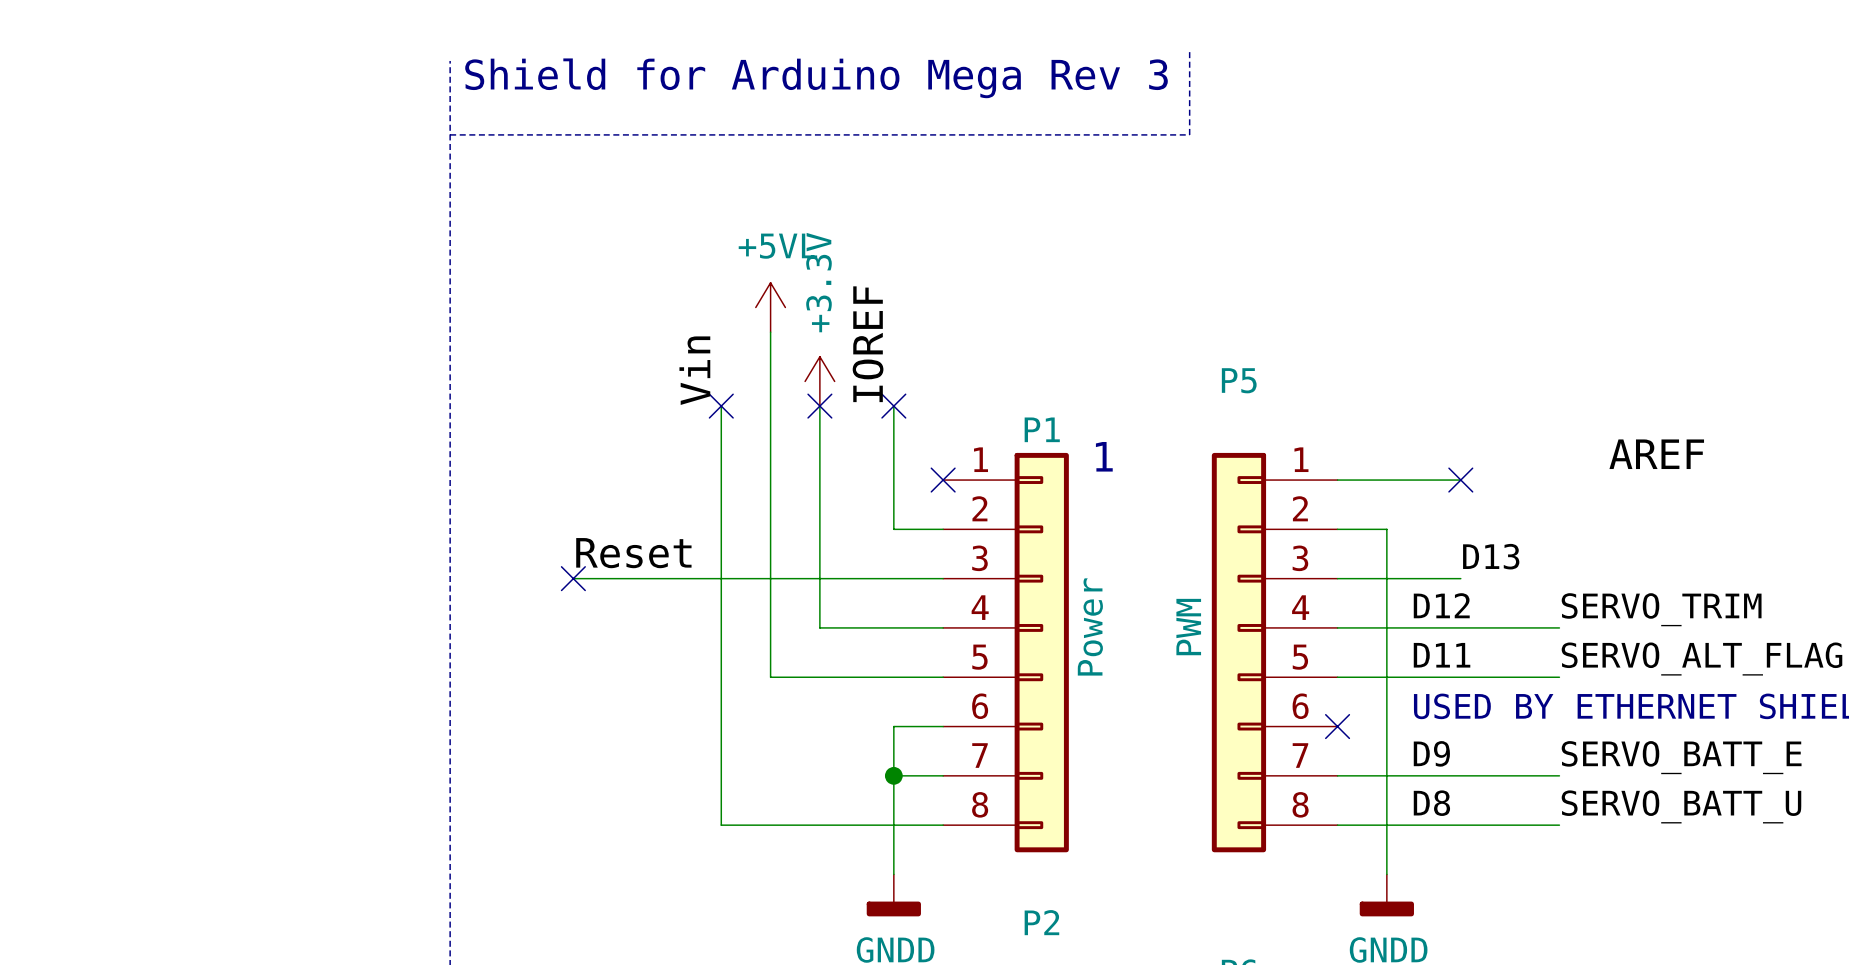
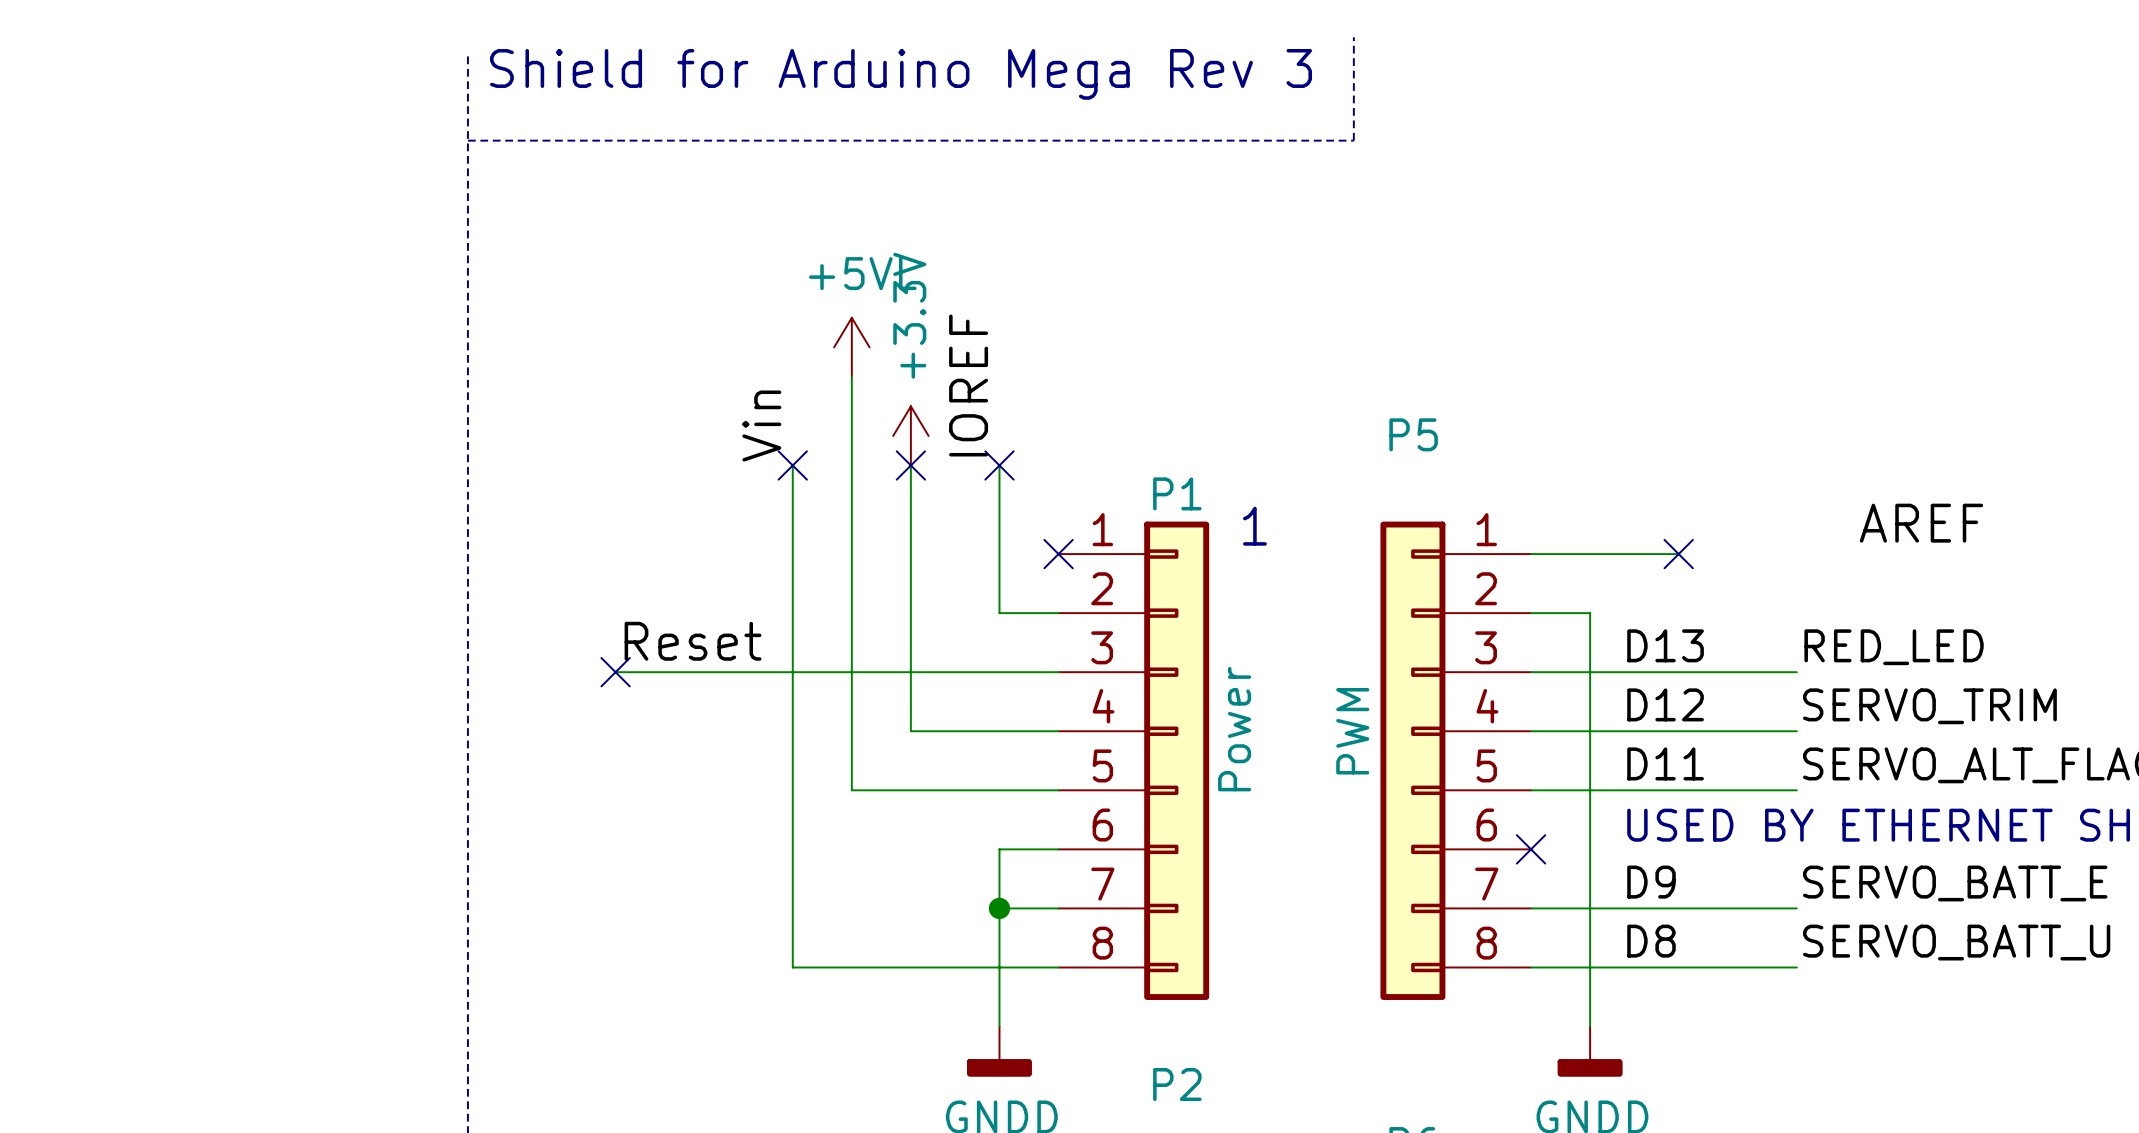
label position: D13 (1491, 556) -> D13 (1665, 645)
label: none -> RED_LED (1894, 647)
wire: none -> (1678, 672) (1796, 672)

